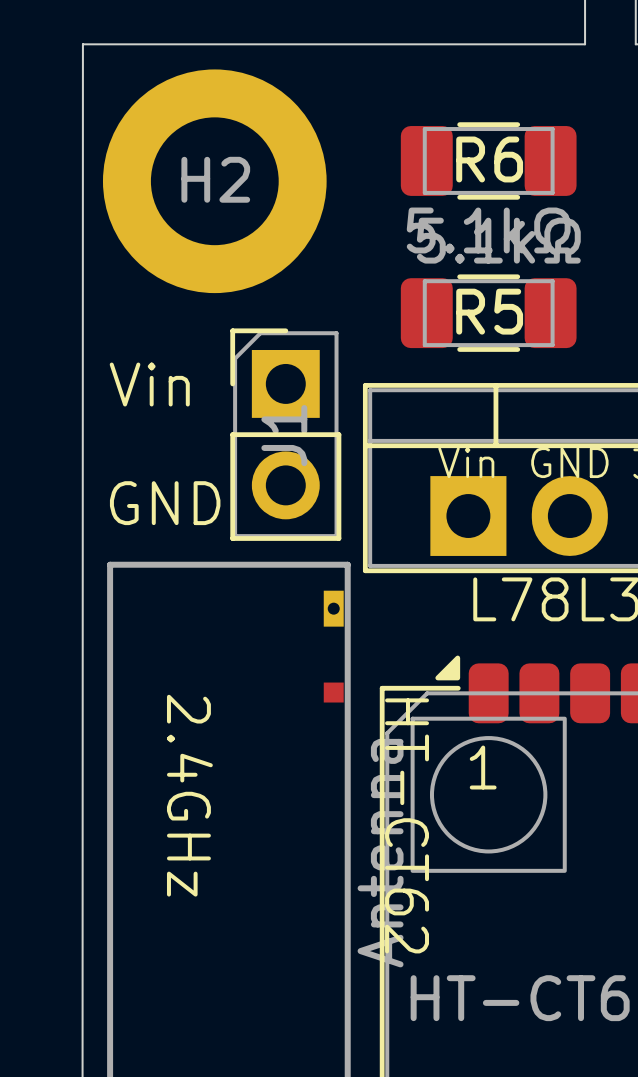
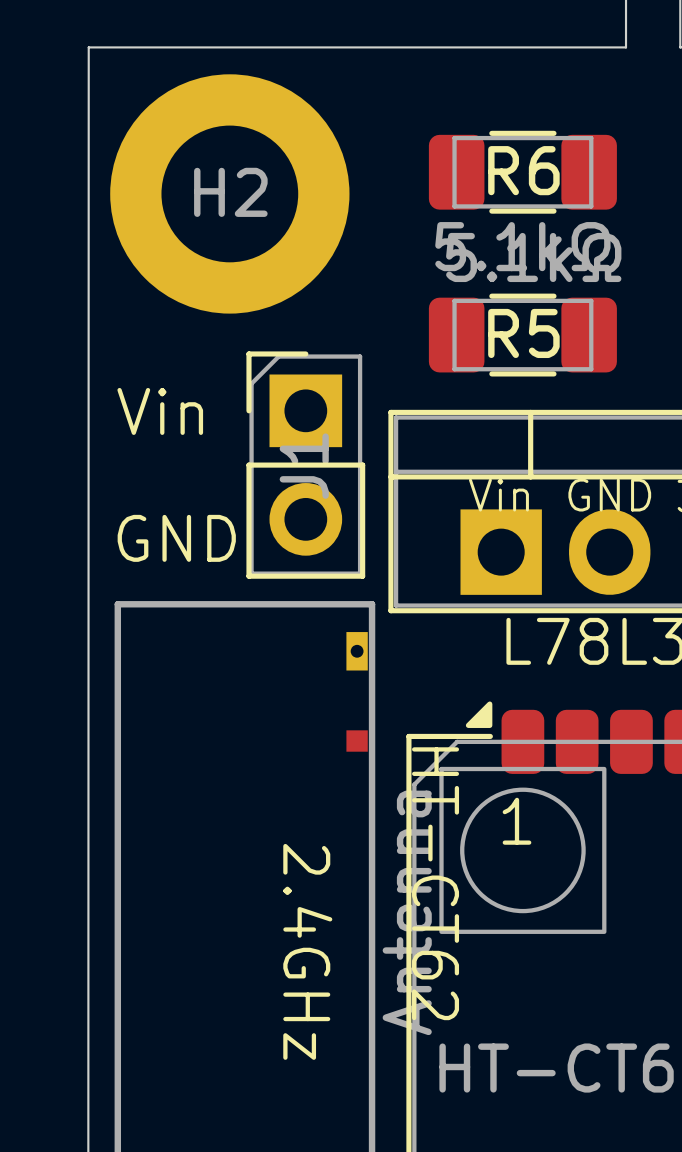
text position: 2.4GHz (189, 795) -> 2.4GHz (307, 951)

